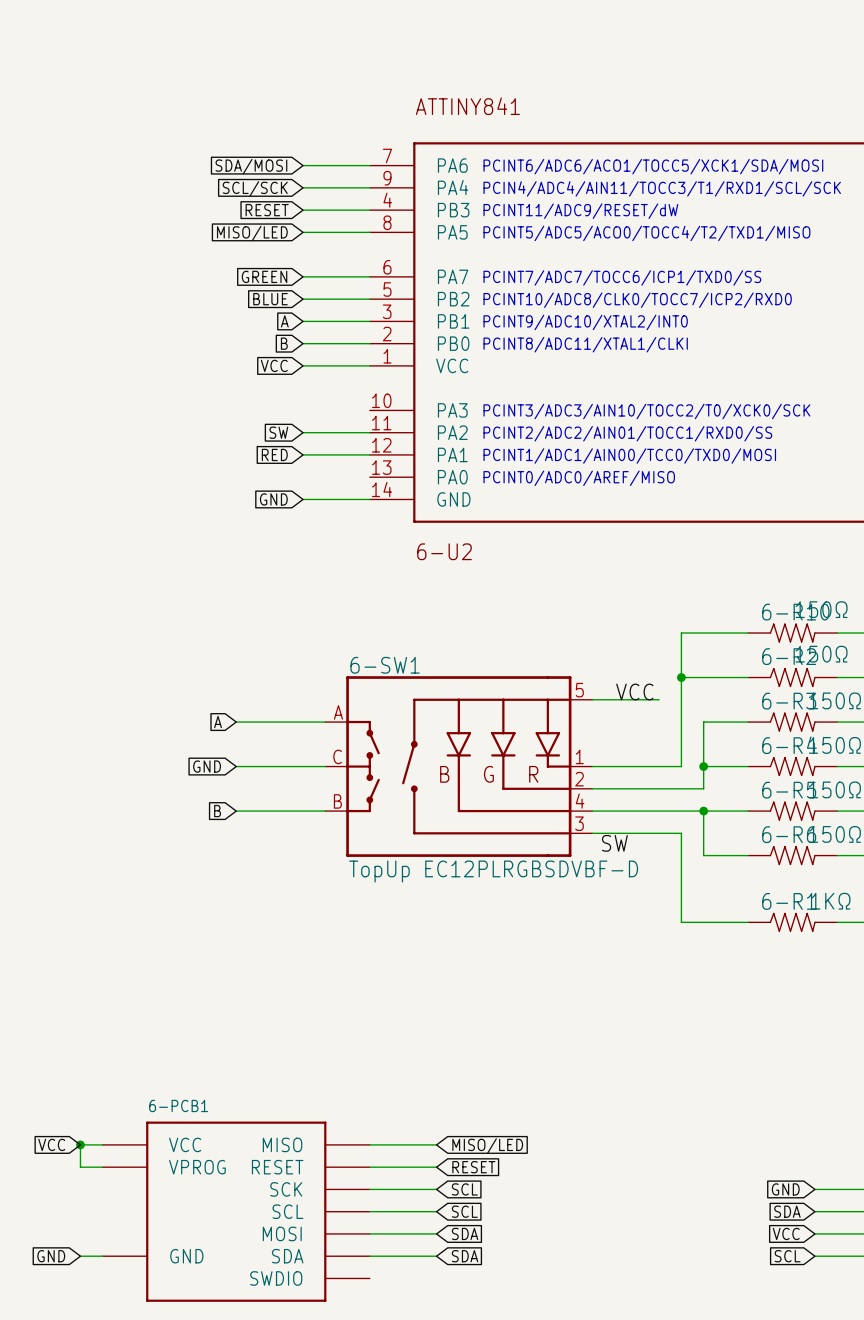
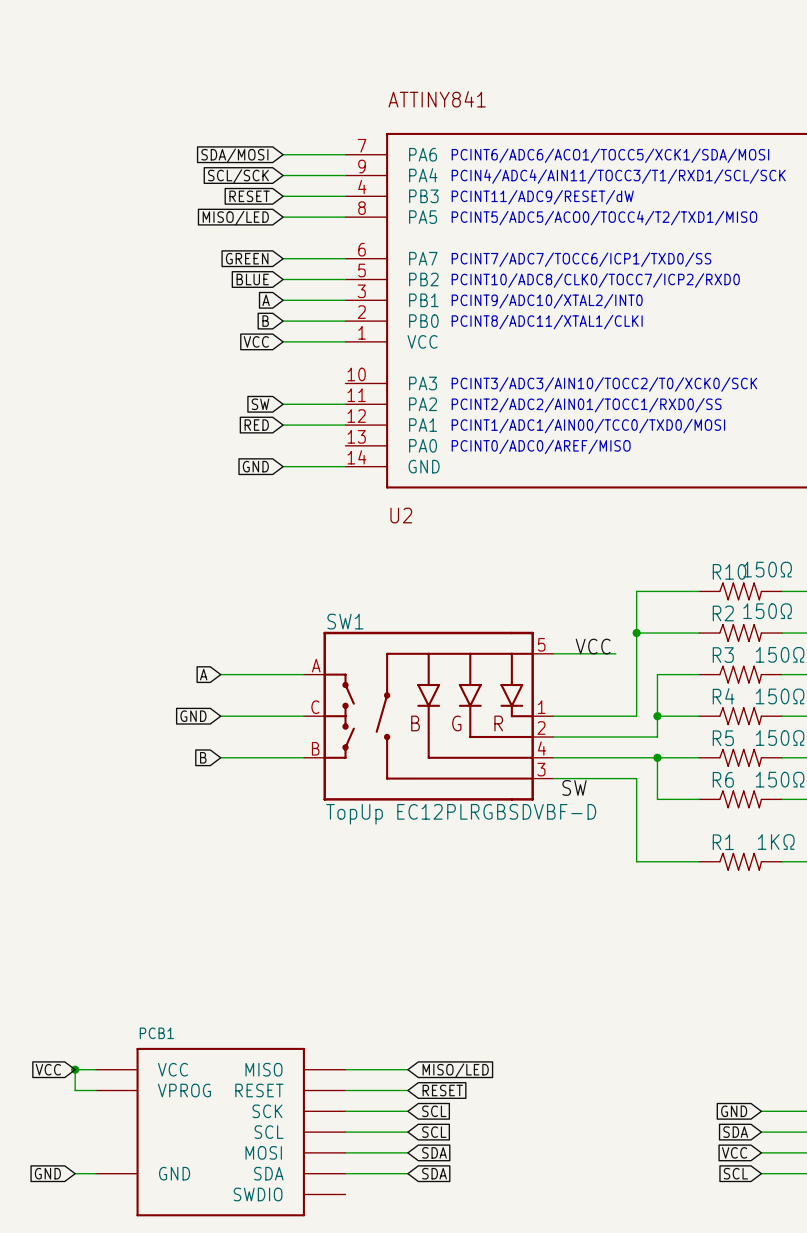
6-U2 name: 6-U2 (444, 551) -> U2 (401, 515)
6-R10 name: 6-R10 (795, 612) -> R10 (729, 571)
6-R2 name: 6-R2 (789, 656) -> R2 (723, 613)
6-SW1 name: 6-SW1 (385, 665) -> SW1 (345, 621)
6-R3 name: 6-R3 (789, 701) -> R3 (723, 655)
6-R4 name: 6-R4 (789, 745) -> R4 (723, 696)
6-R5 name: 6-R5 (789, 790) -> R5 (723, 738)
6-R6 name: 6-R6 (789, 834) -> R6 (723, 779)
6-R1 name: 6-R1 (789, 901) -> R1 (723, 842)
6-PCB1 name: 6-PCB1 (178, 1105) -> PCB1 (156, 1033)

